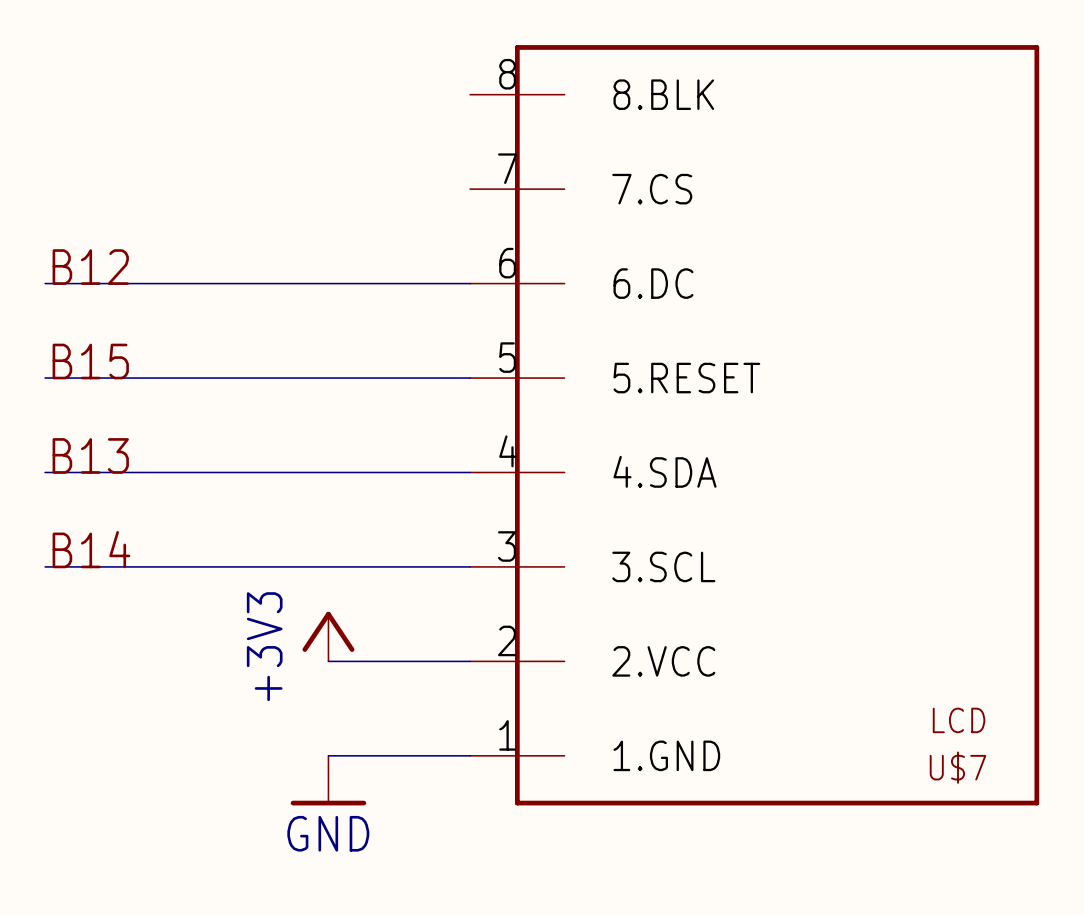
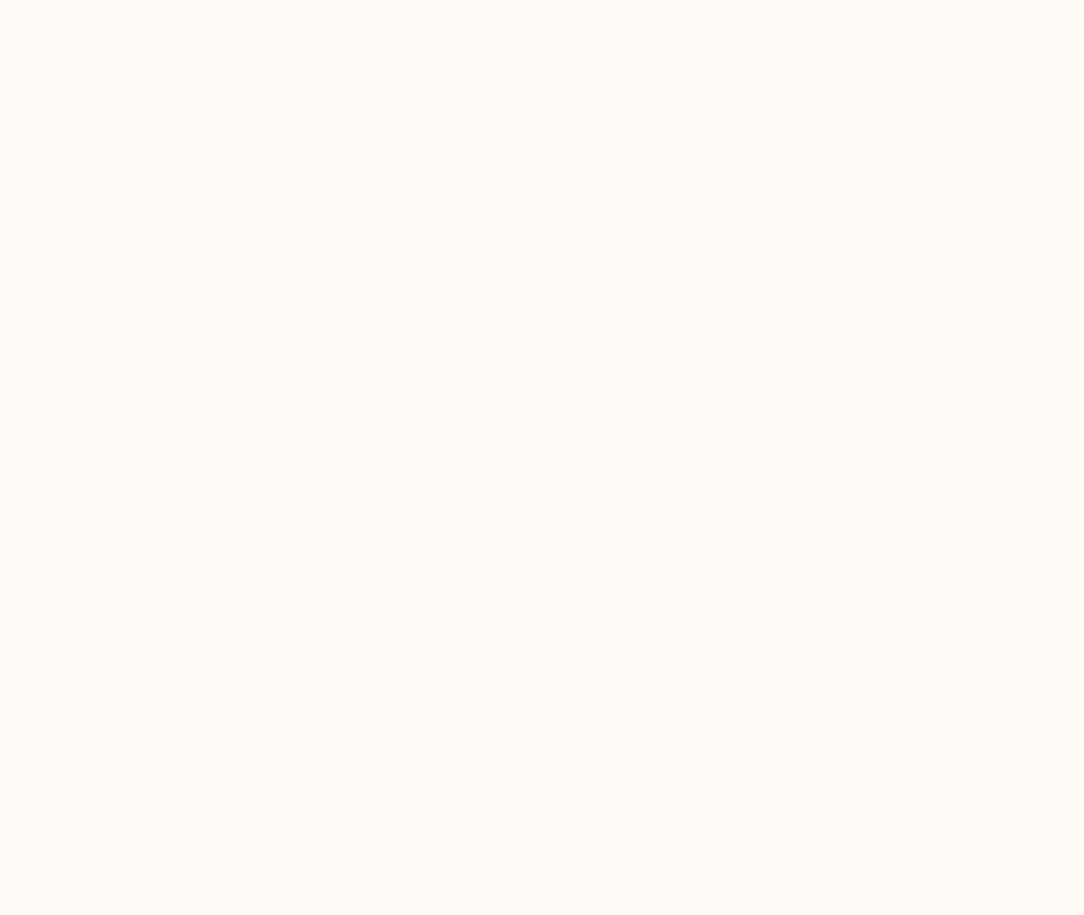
label: B12 (90, 267) -> none
wire: (45, 283) (470, 283) -> none
label: B15 (90, 361) -> none
wire: (45, 378) (470, 378) -> none
U$7: LCD (754, 425) -> none
label: B13 (90, 455) -> none
wire: (45, 472) (470, 472) -> none
label: B14 (91, 549) -> none
wire: (45, 566) (470, 566) -> none
power symbol: +3V3 (328, 636) -> none
wire: (328, 661) (470, 661) -> none
wire: (328, 755) (470, 755) -> none
power symbol: GND (328, 780) -> none

